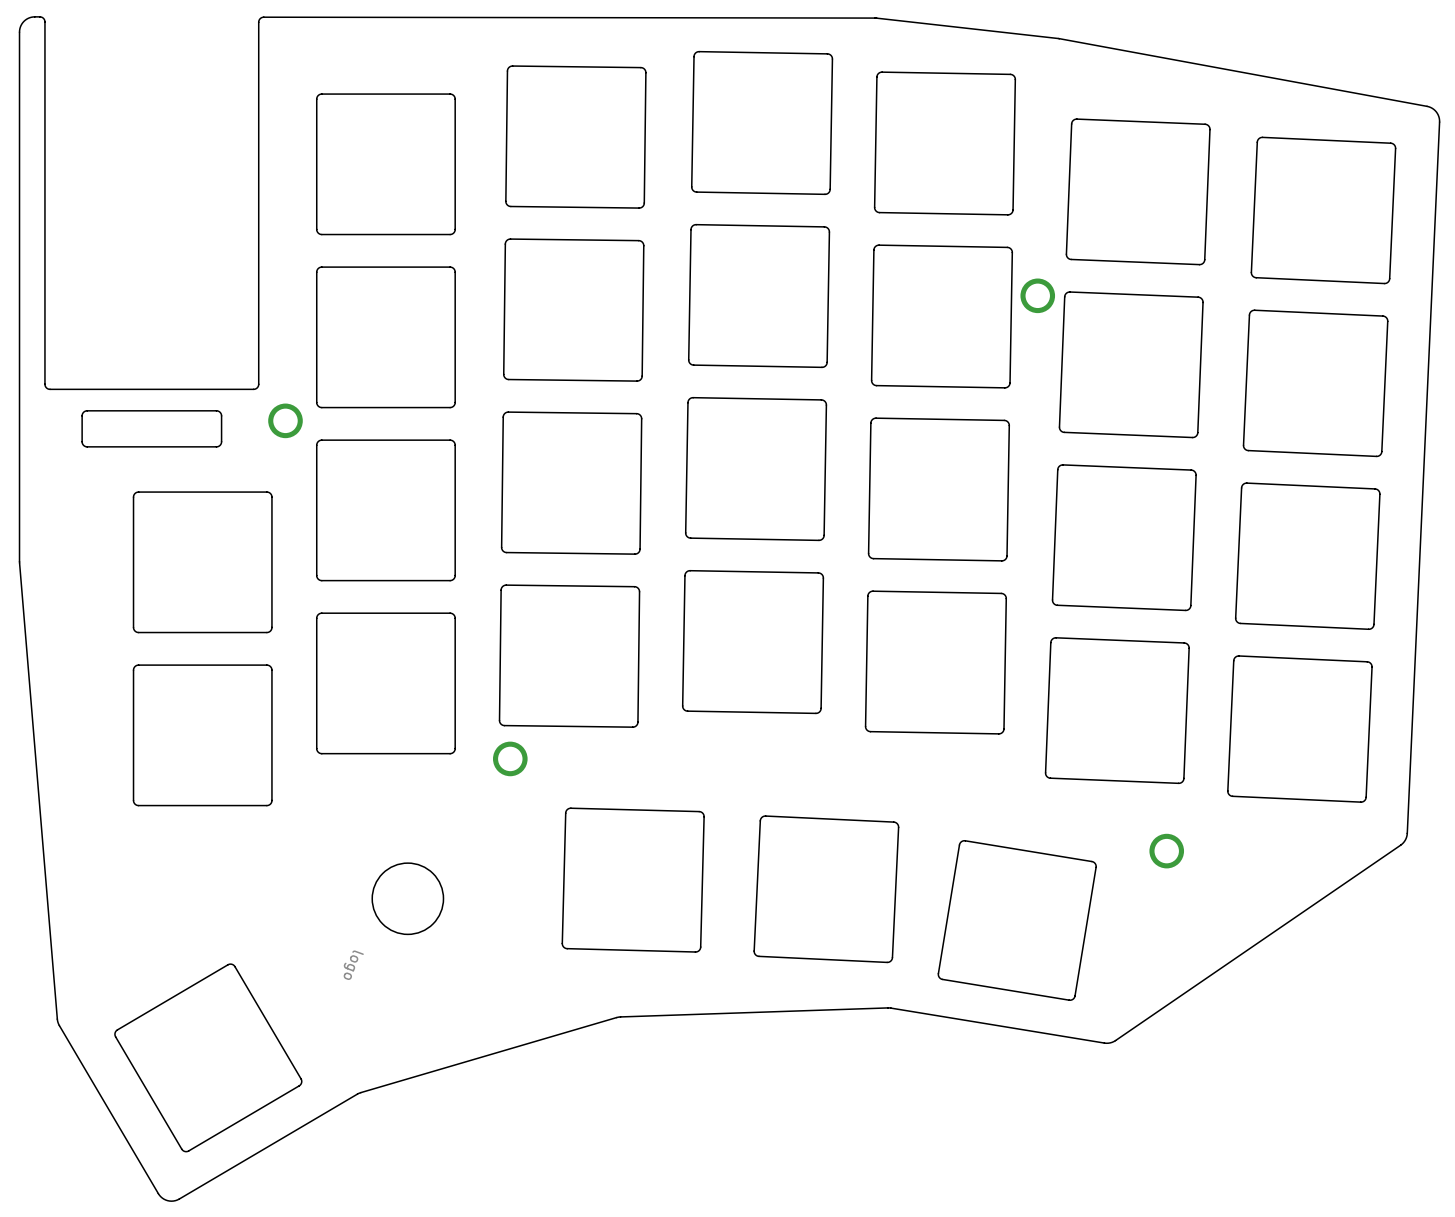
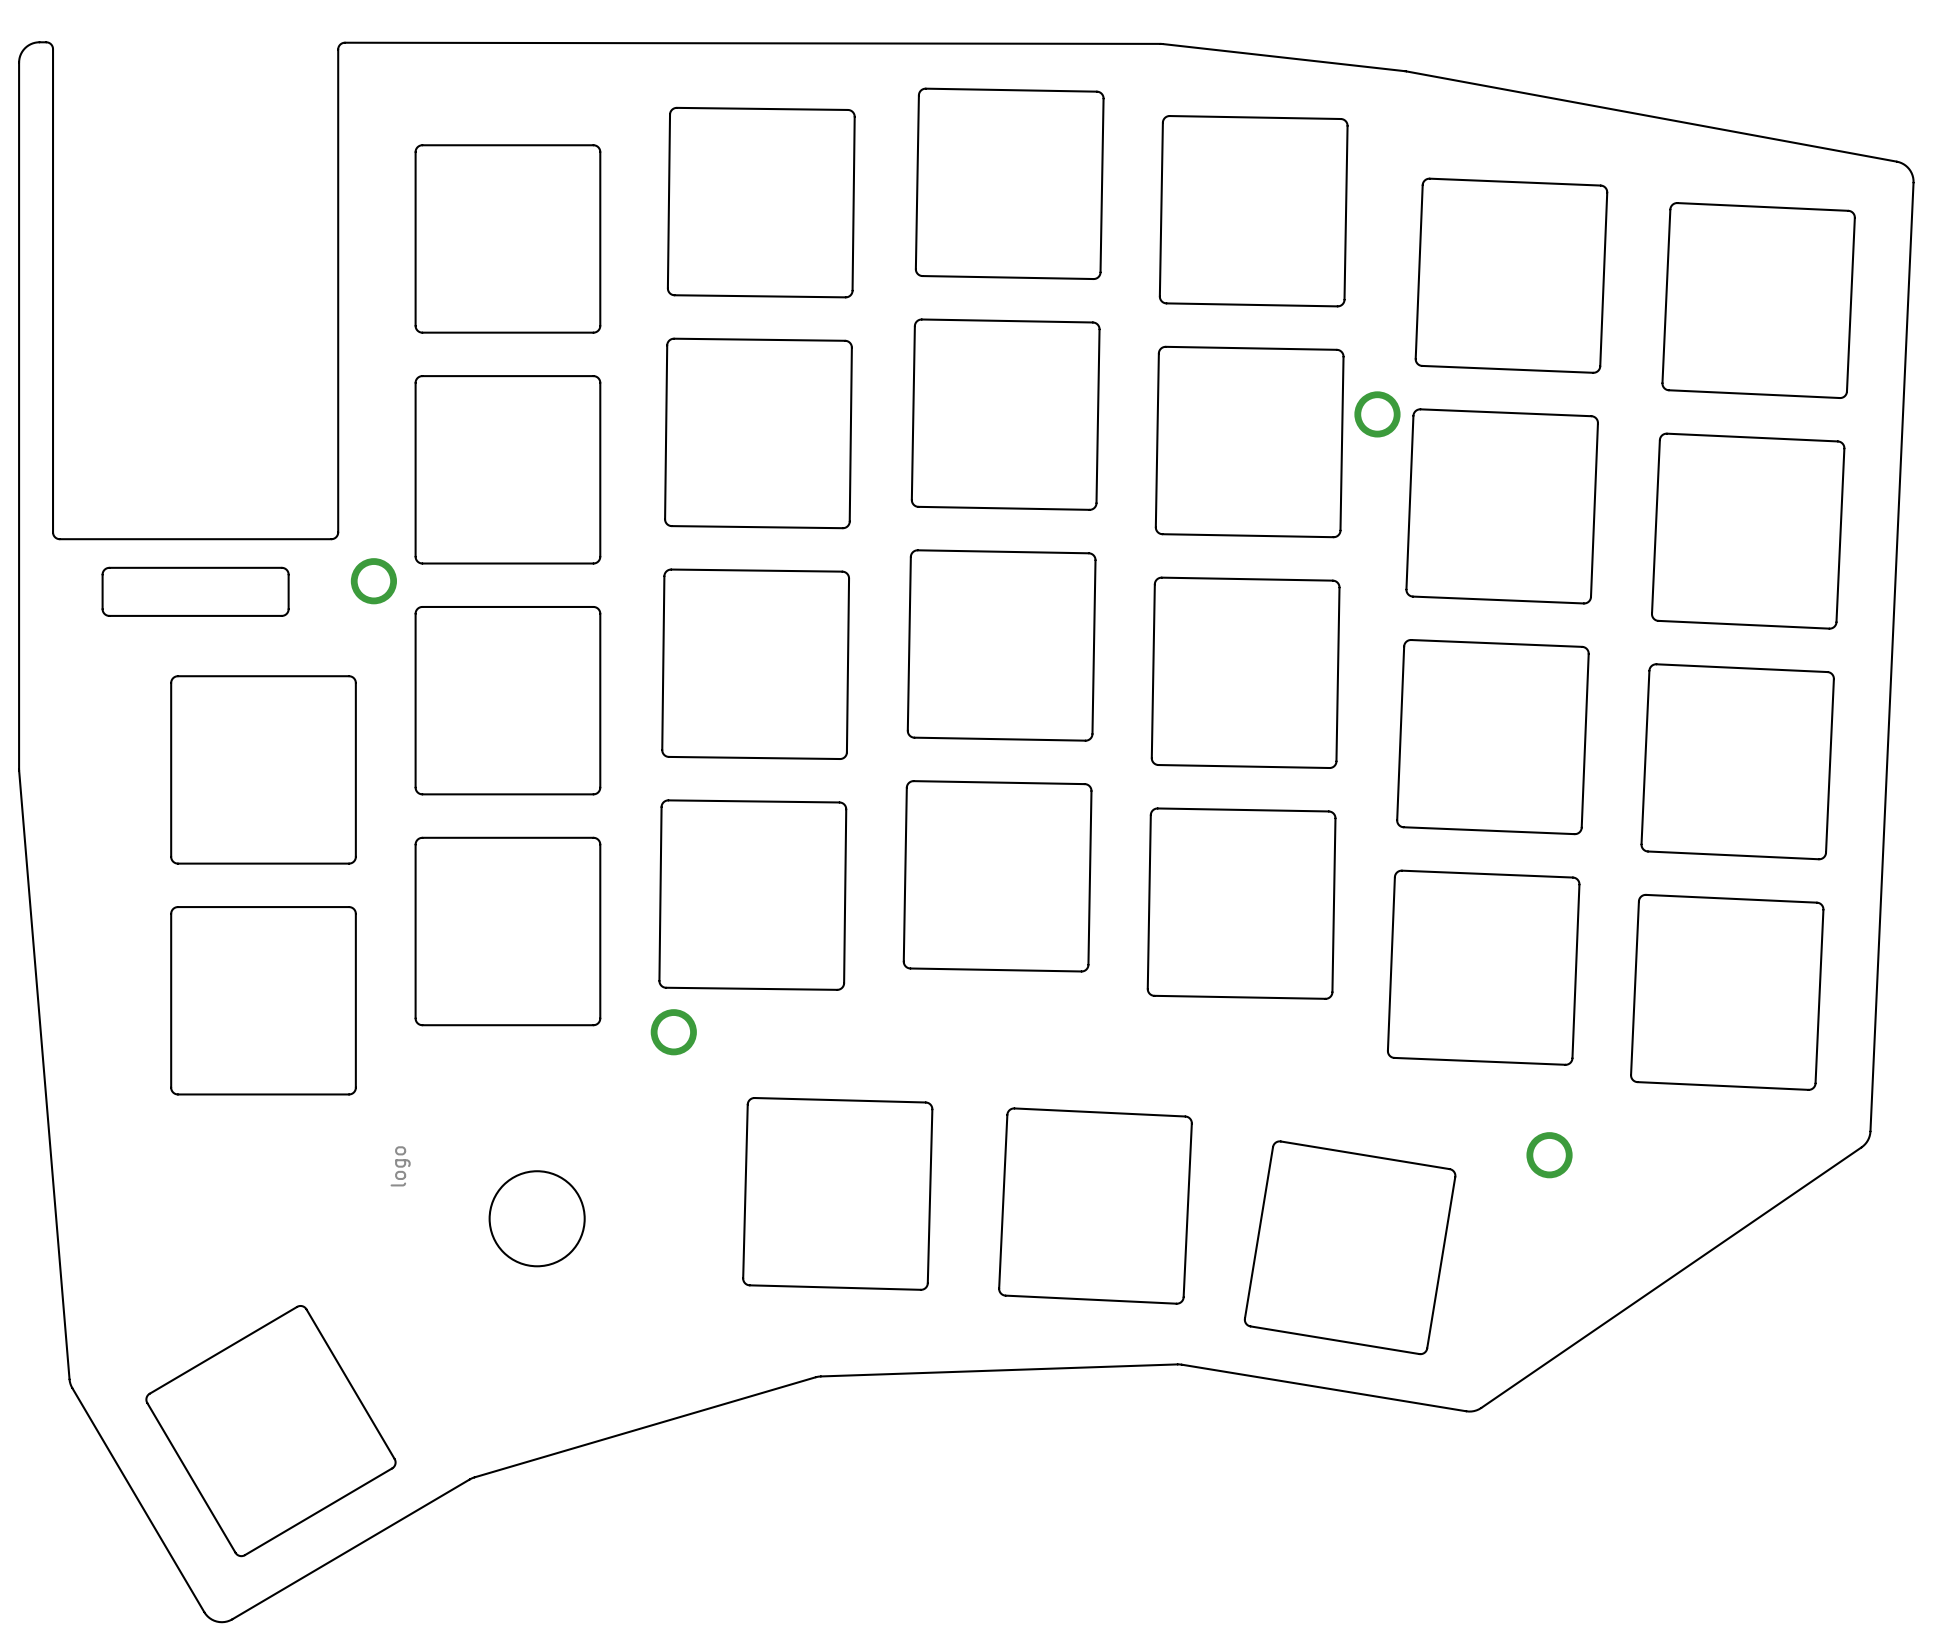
drawing position: (353, 965) -> (400, 1166)

